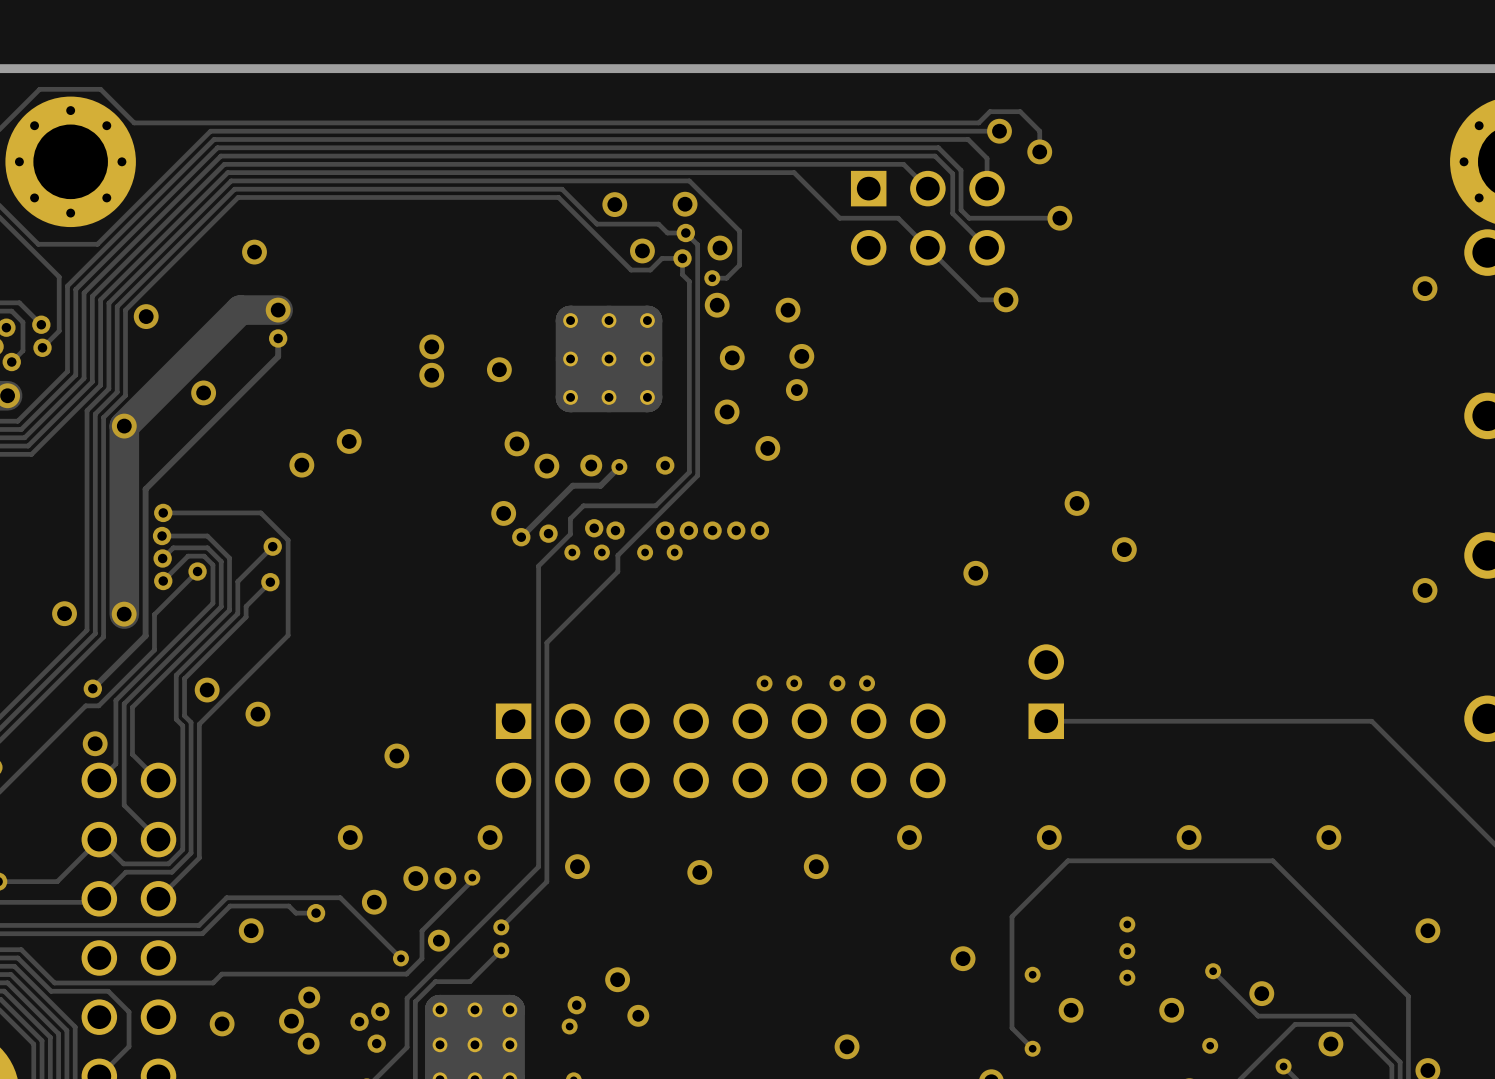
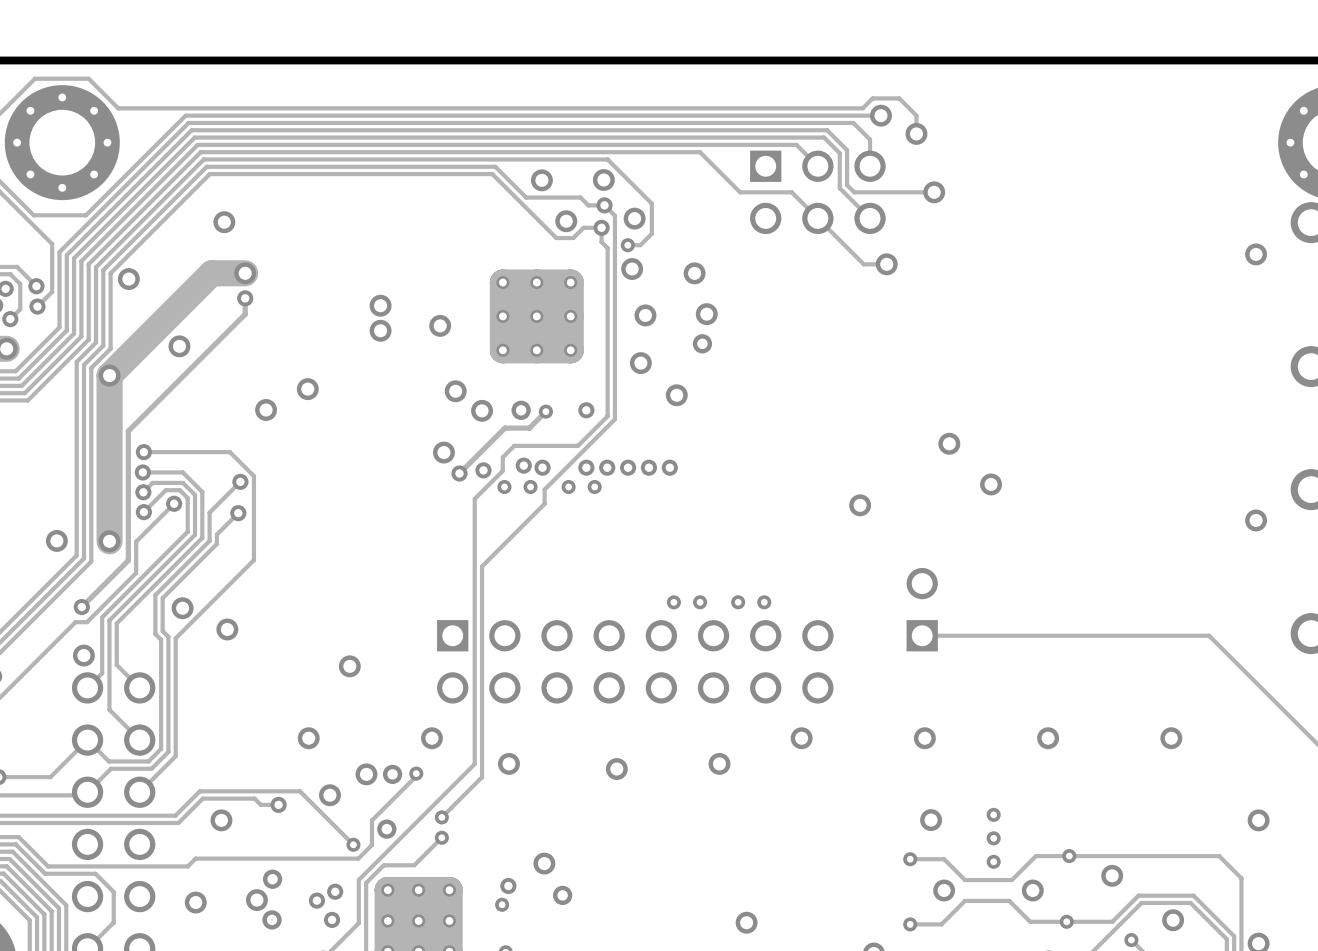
via position: (963, 958) -> (931, 820)
track: (1213, 971) (1258, 1016) (1291, 1016) -> (910, 924) (941, 924) (964, 900) (1009, 900) (1030, 921) (1112, 921) (1138, 895)
track: (1383, 971) (1272, 860) (1067, 860) (1011, 916) (1011, 1028) (1032, 1048) -> (1219, 856) (1035, 856) (1011, 880) (964, 880) (944, 859) (910, 859)

